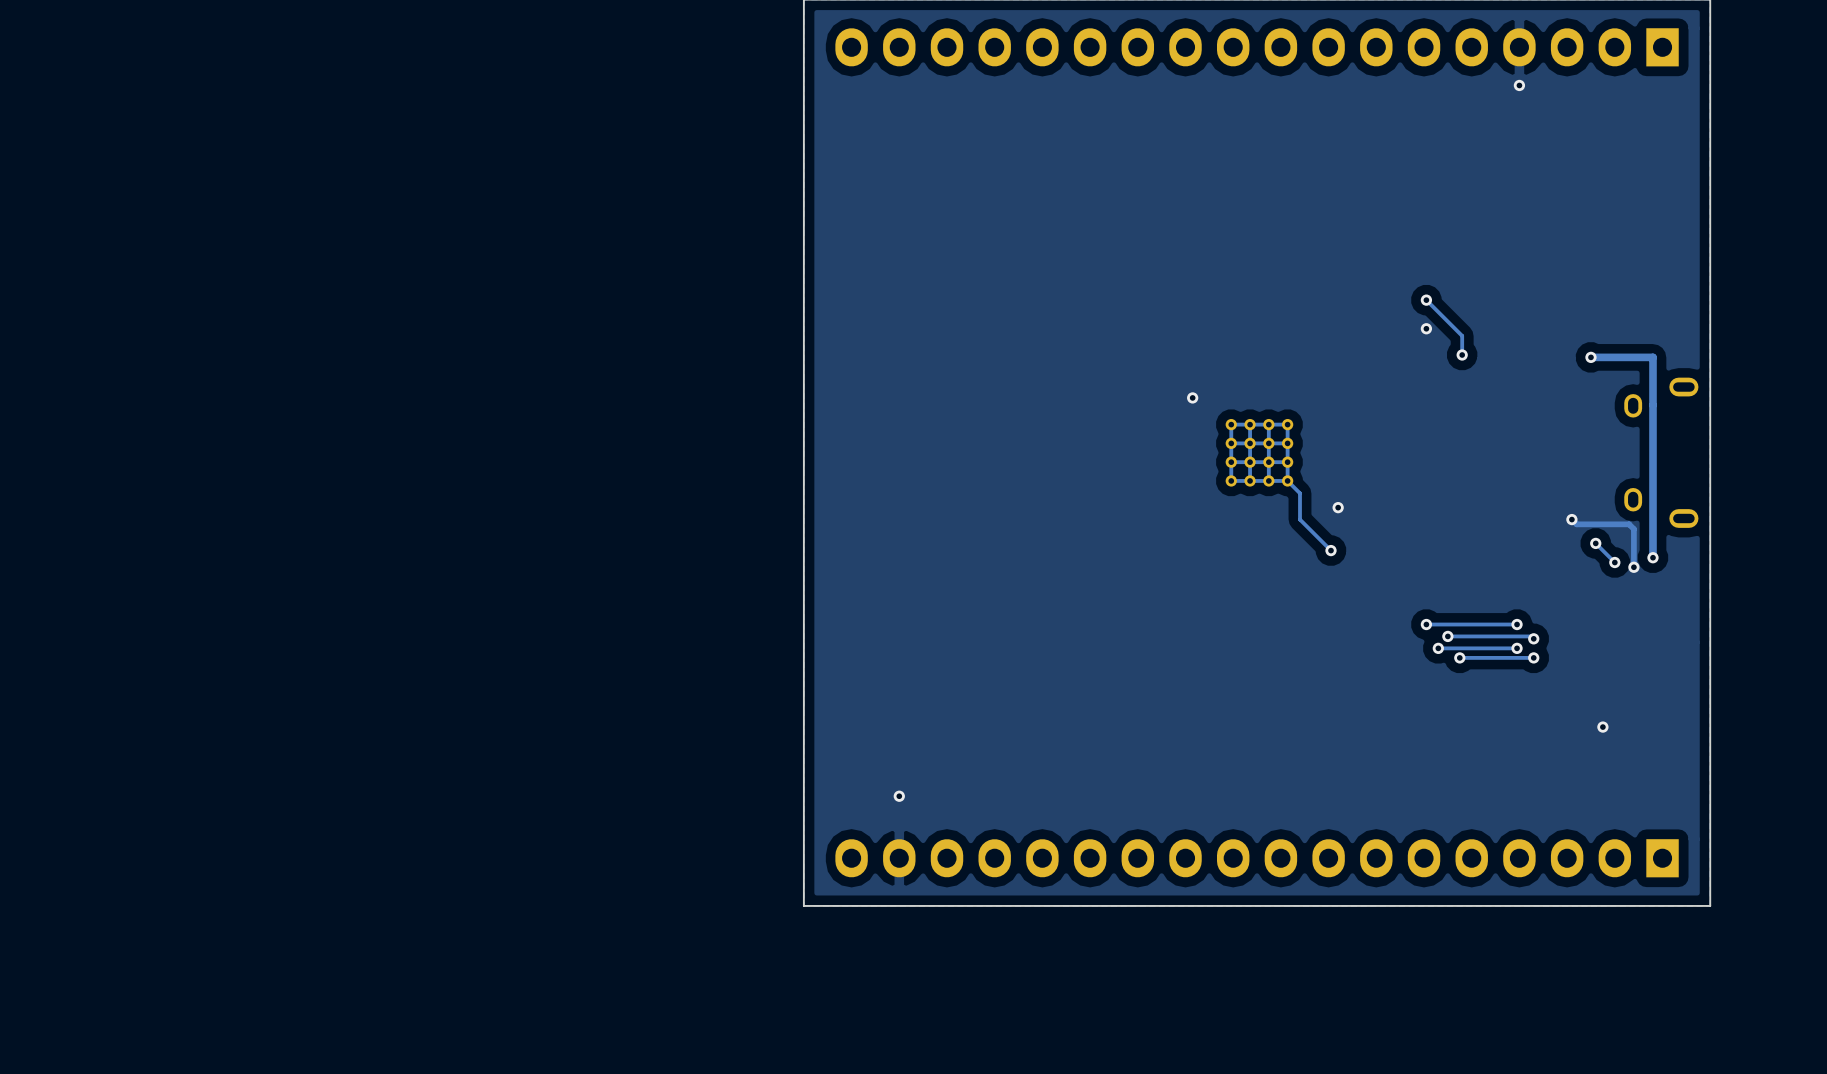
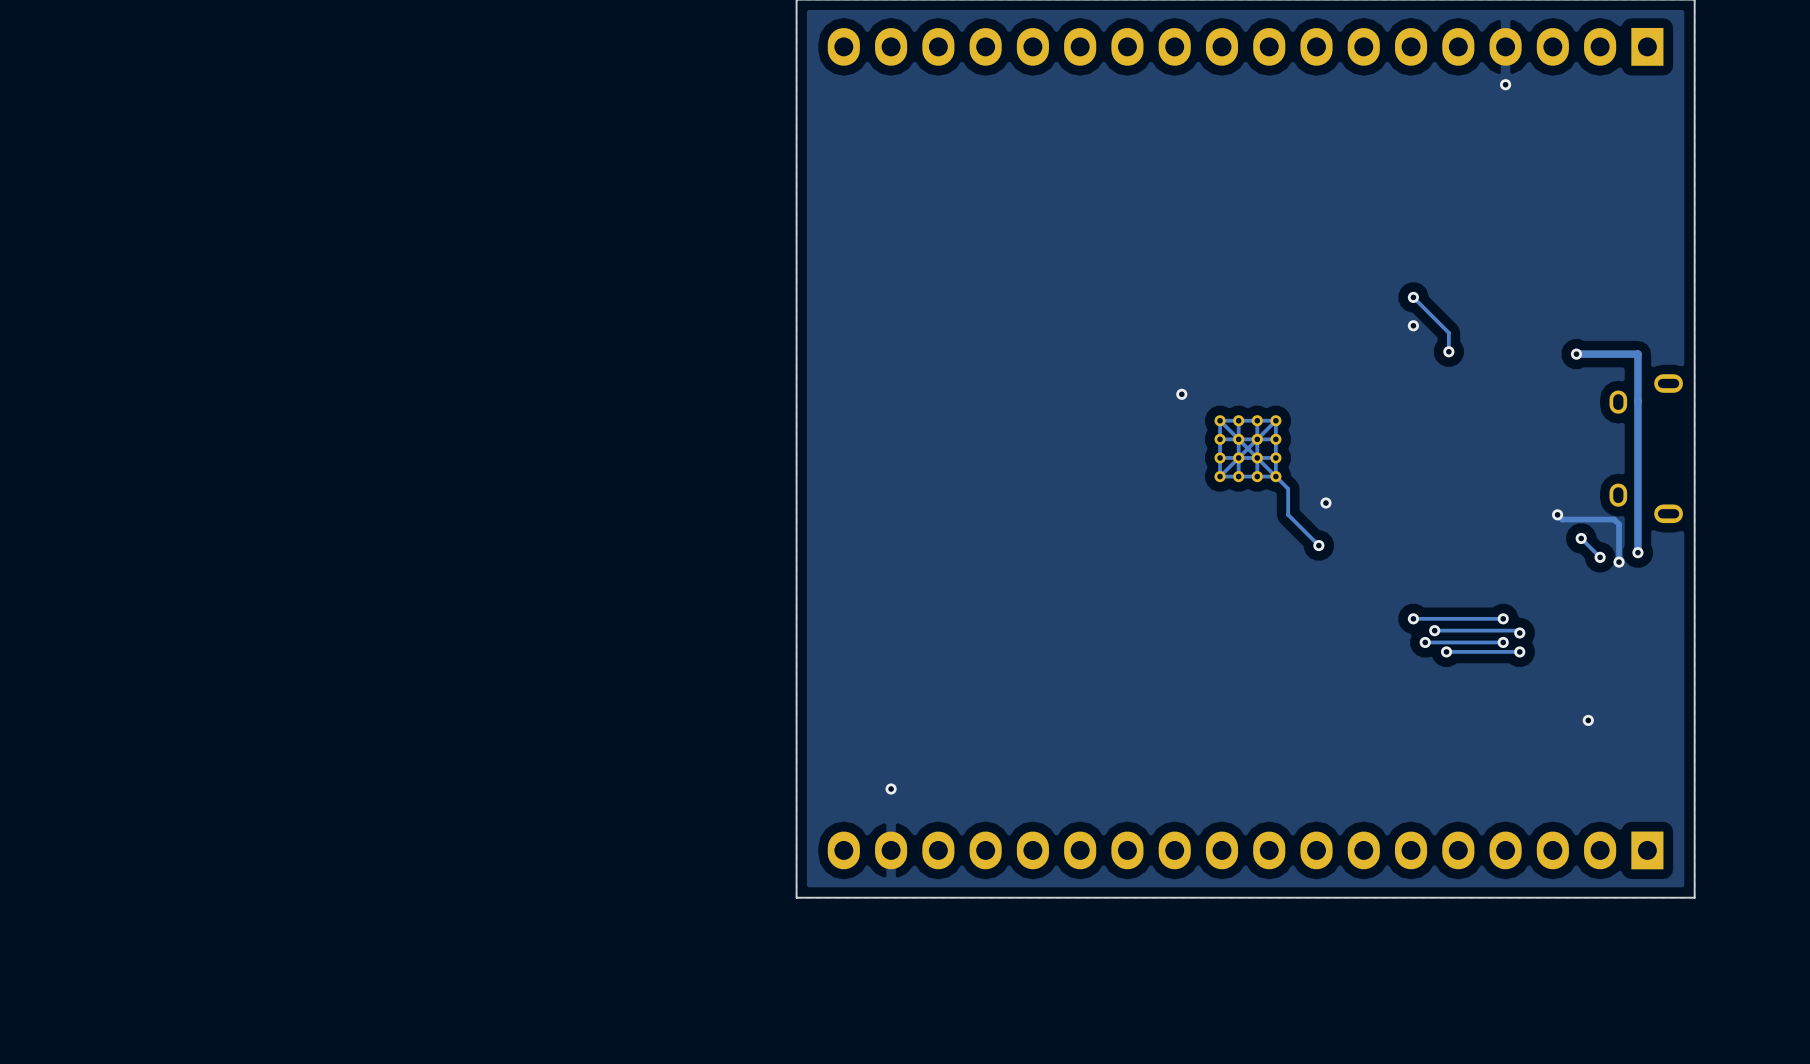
track: none -> (1220, 420) (1275, 476)
track: none -> (1275, 420) (1220, 476)

